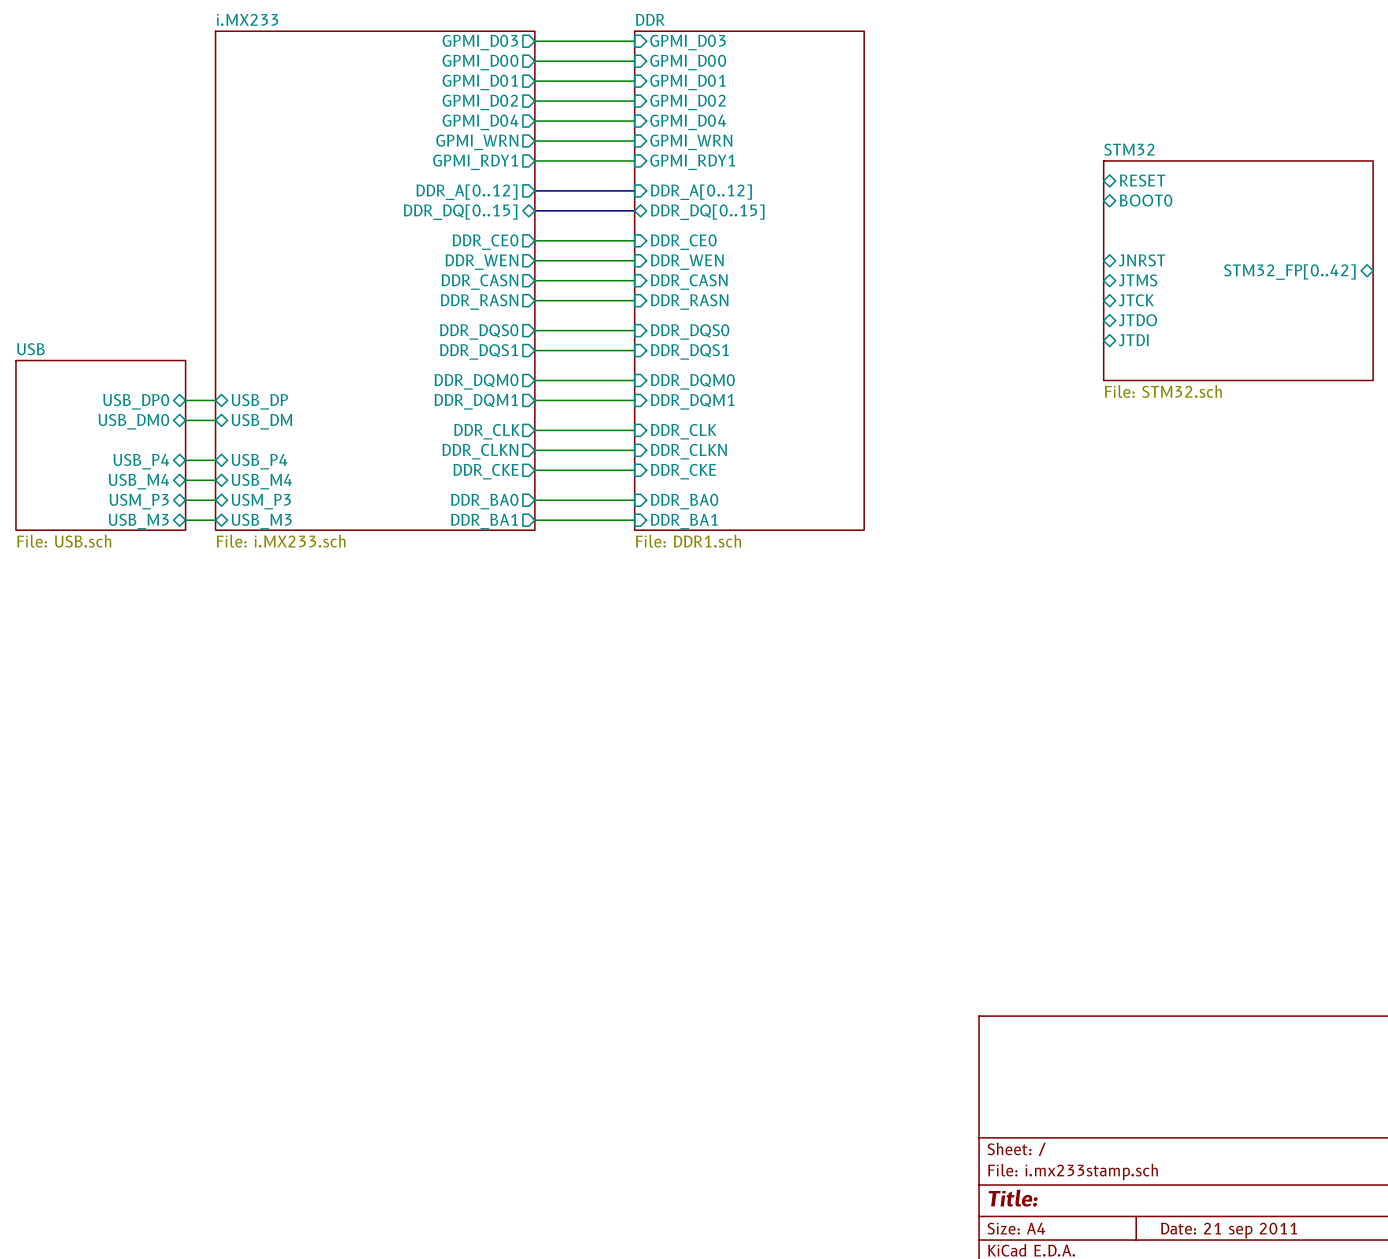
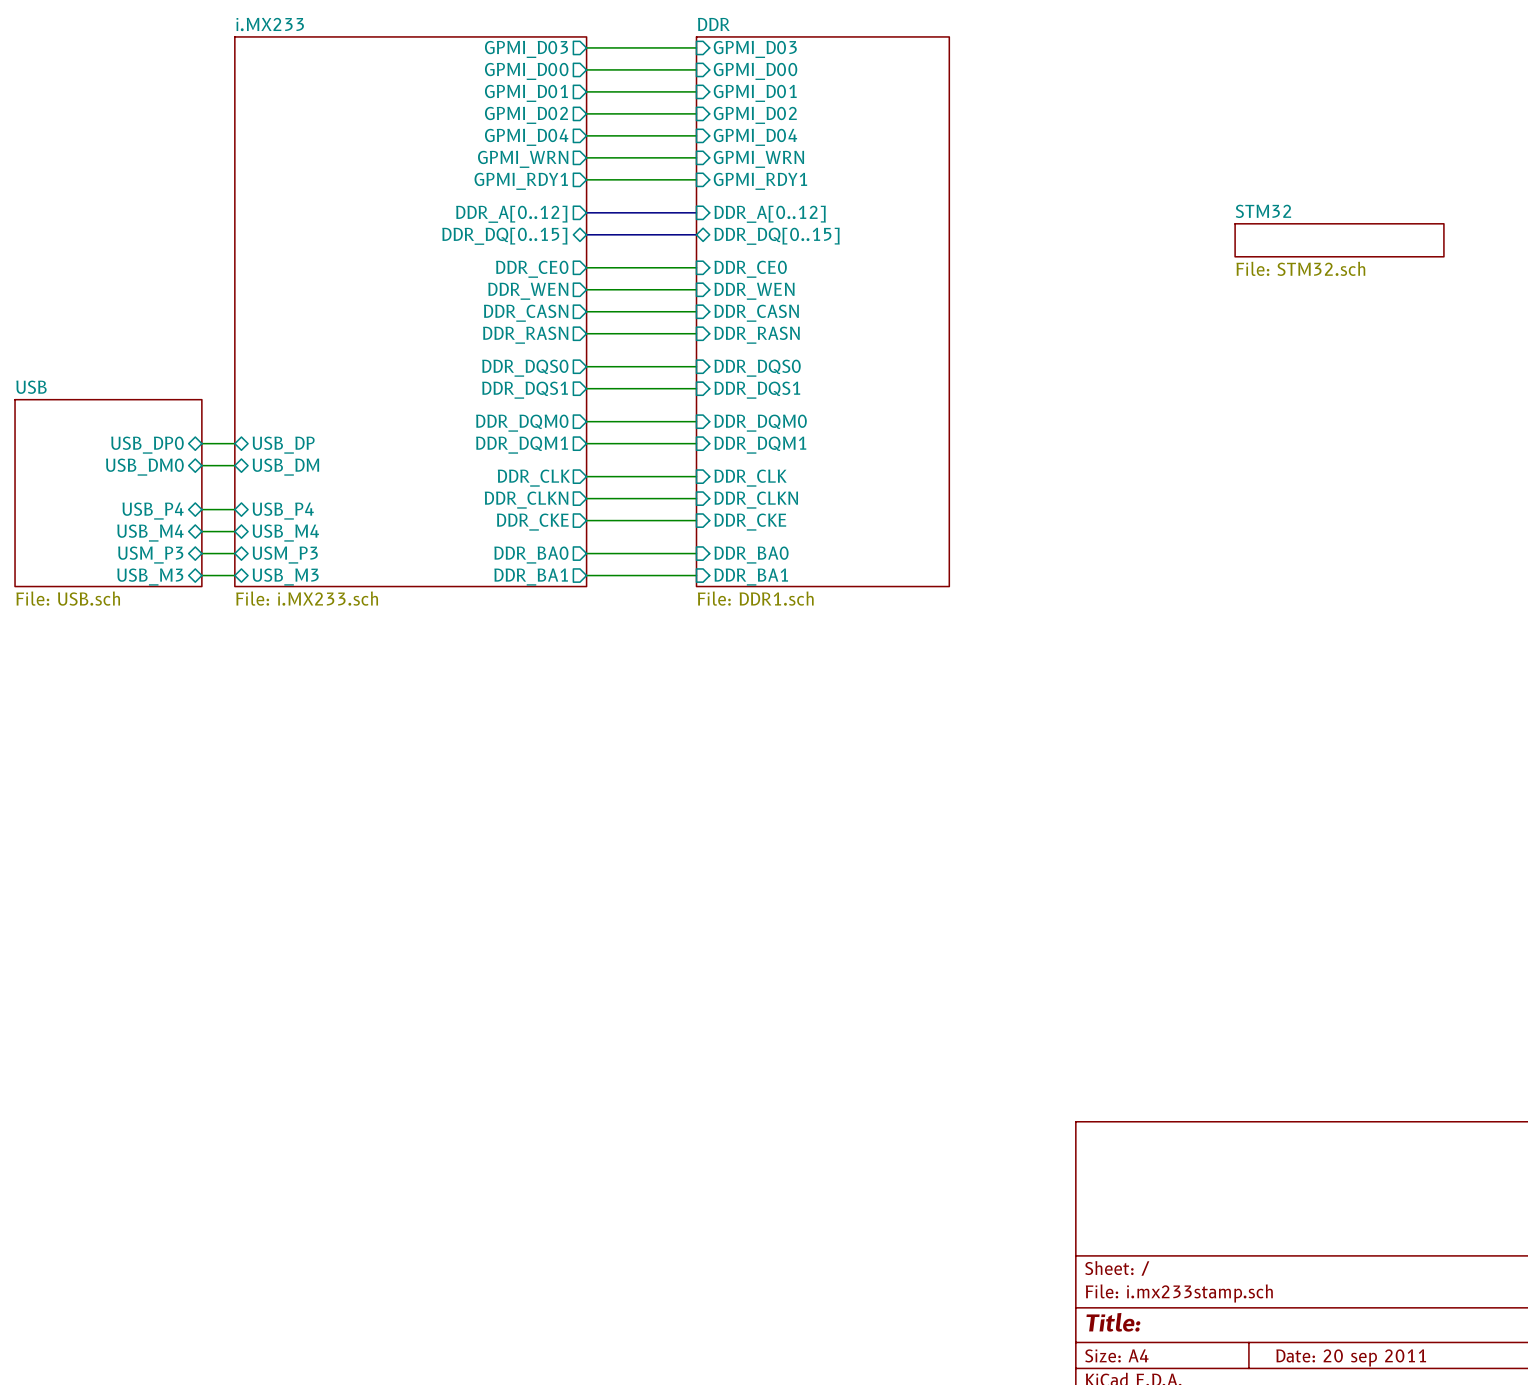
sheet STM32 name position: STM32 (1129, 149) -> STM32 (1263, 211)
sheet STM32 shape: [1103, 160, 1374, 381] -> [1235, 223, 1444, 257]
sheet pin: RESET (1142, 180) -> none
sheet pin: BOOT0 (1146, 200) -> none
sheet pin: JNRST (1141, 260) -> none
sheet pin: STM32_FP[0..42] (1289, 272) -> none
sheet pin: JTMS (1137, 280) -> none
sheet pin: JTCK (1136, 300) -> none
sheet pin: JTDO (1137, 320) -> none
sheet pin: JTDI (1133, 340) -> none
sheet STM32 value position: File: STM32.sch (1163, 391) -> File: STM32.sch (1300, 268)
title block: Date: 21 sep 2011 (1229, 1230) -> Date: 20 sep 2011 (1351, 1357)

